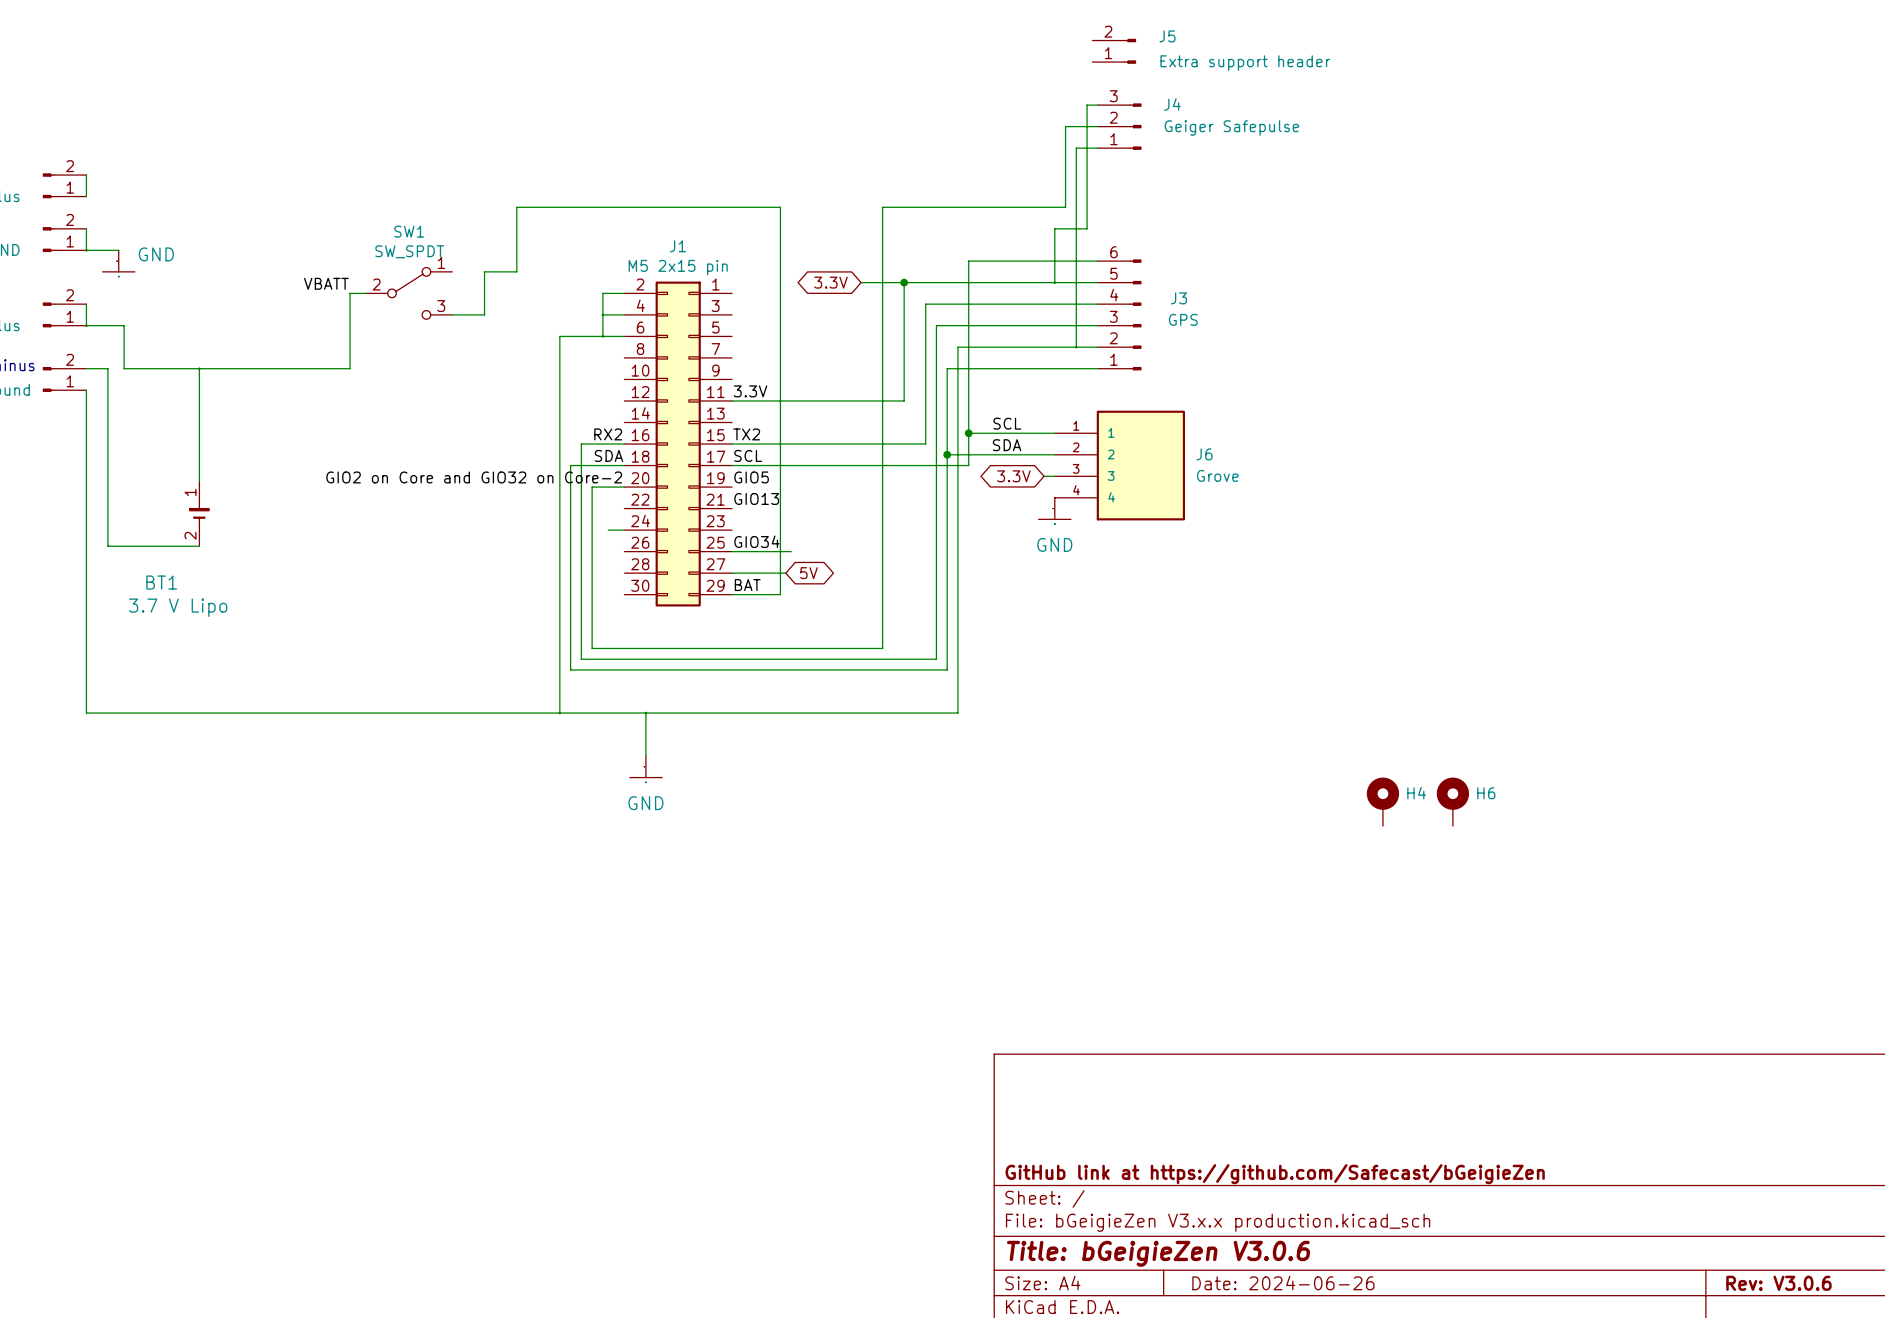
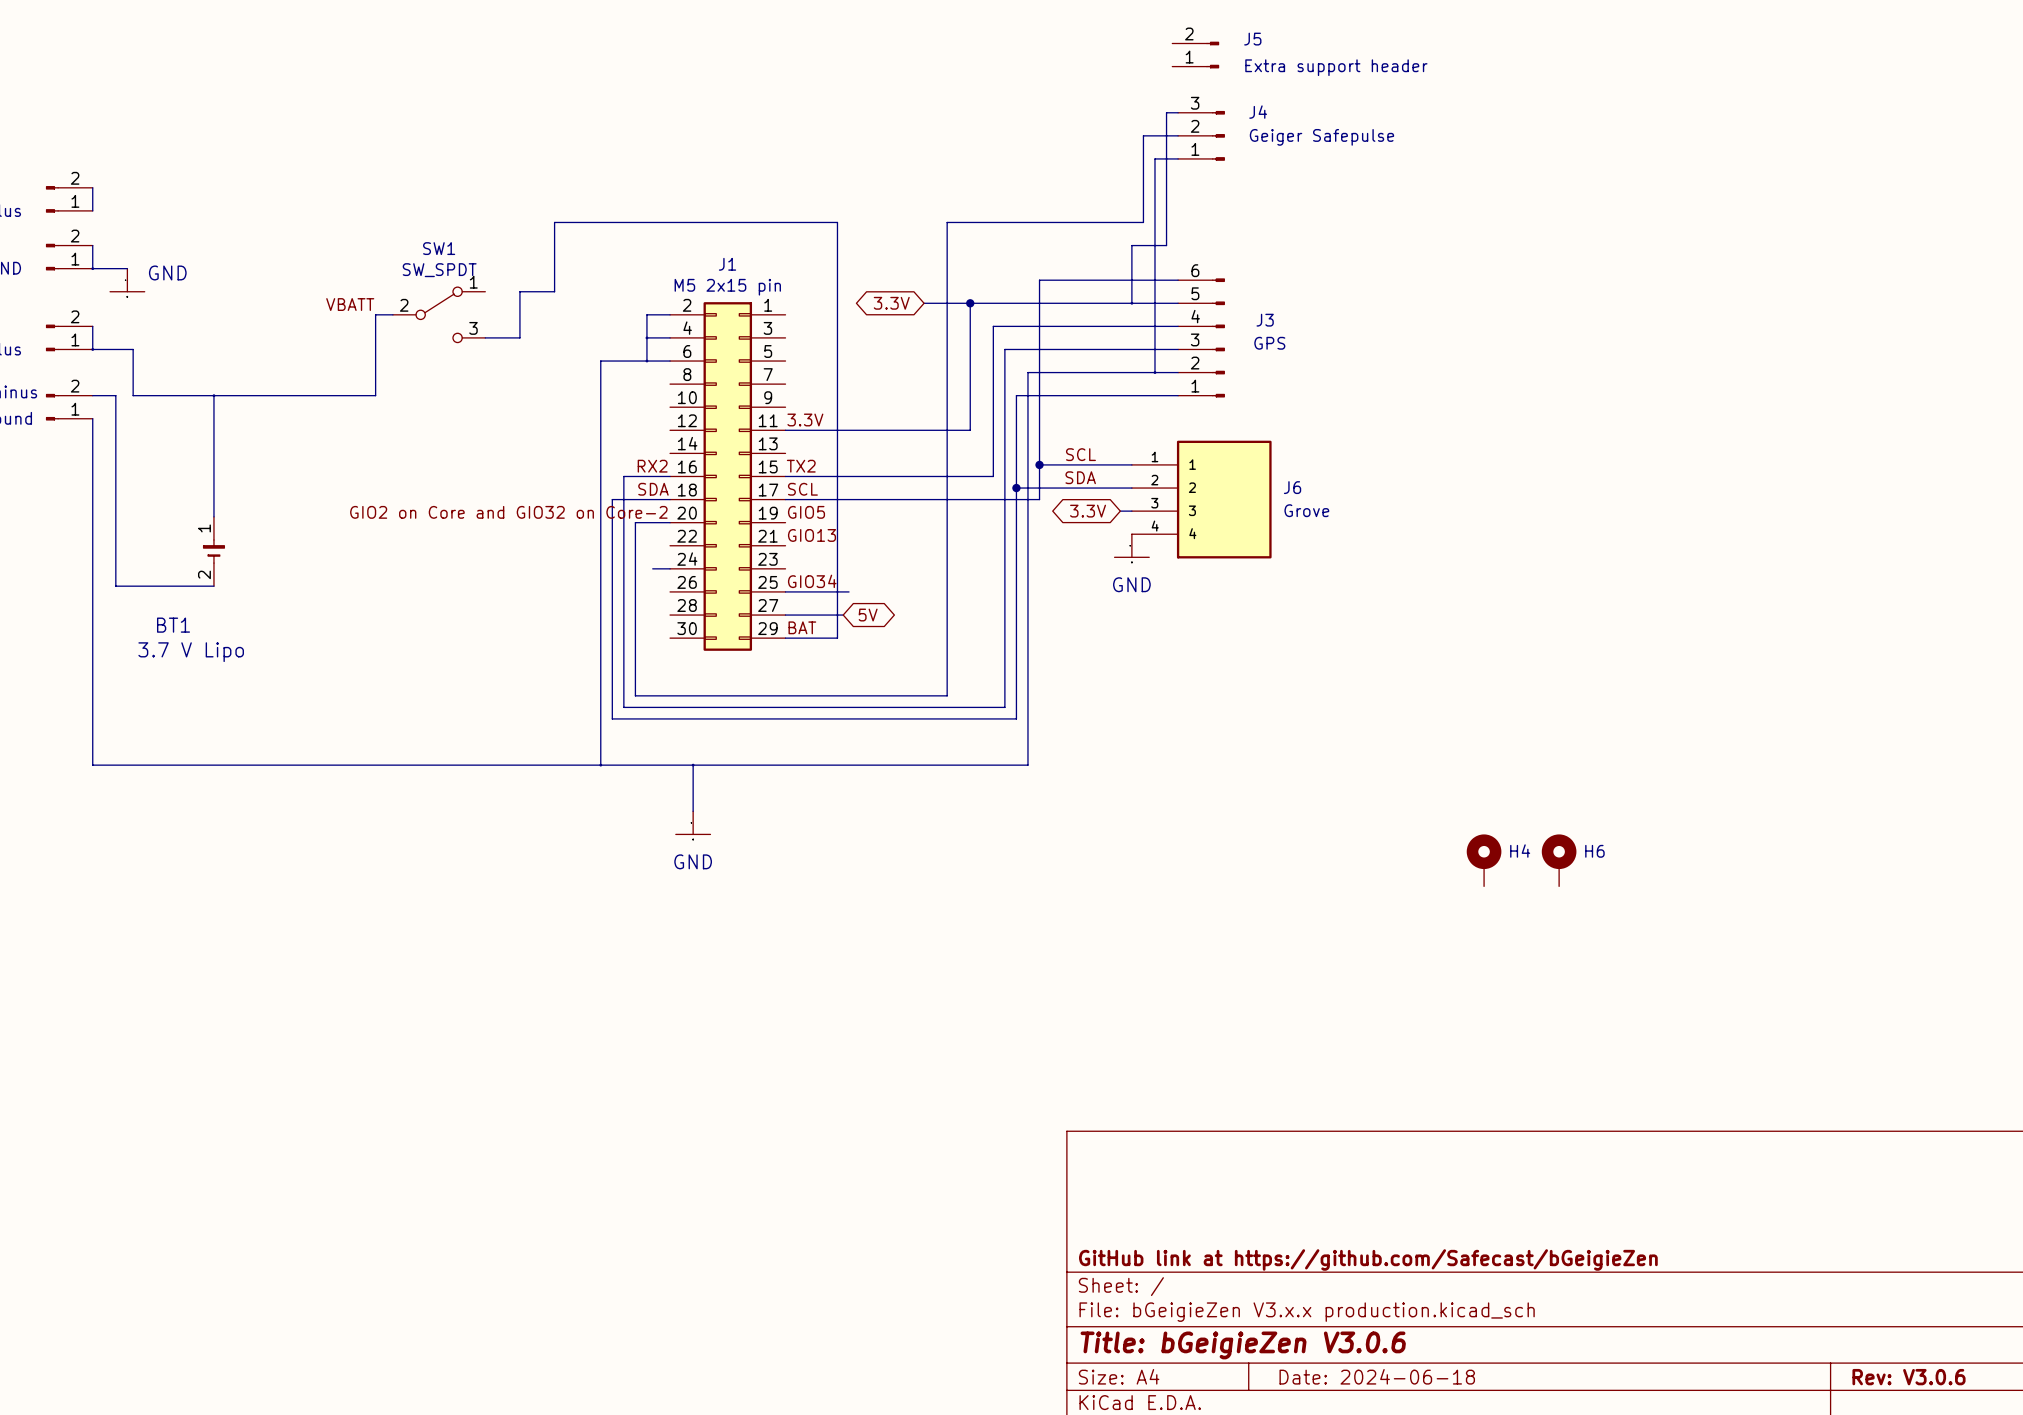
title block: Date: 2024-06-26 (1283, 1283) -> Date: 2024-06-18 (1377, 1376)

